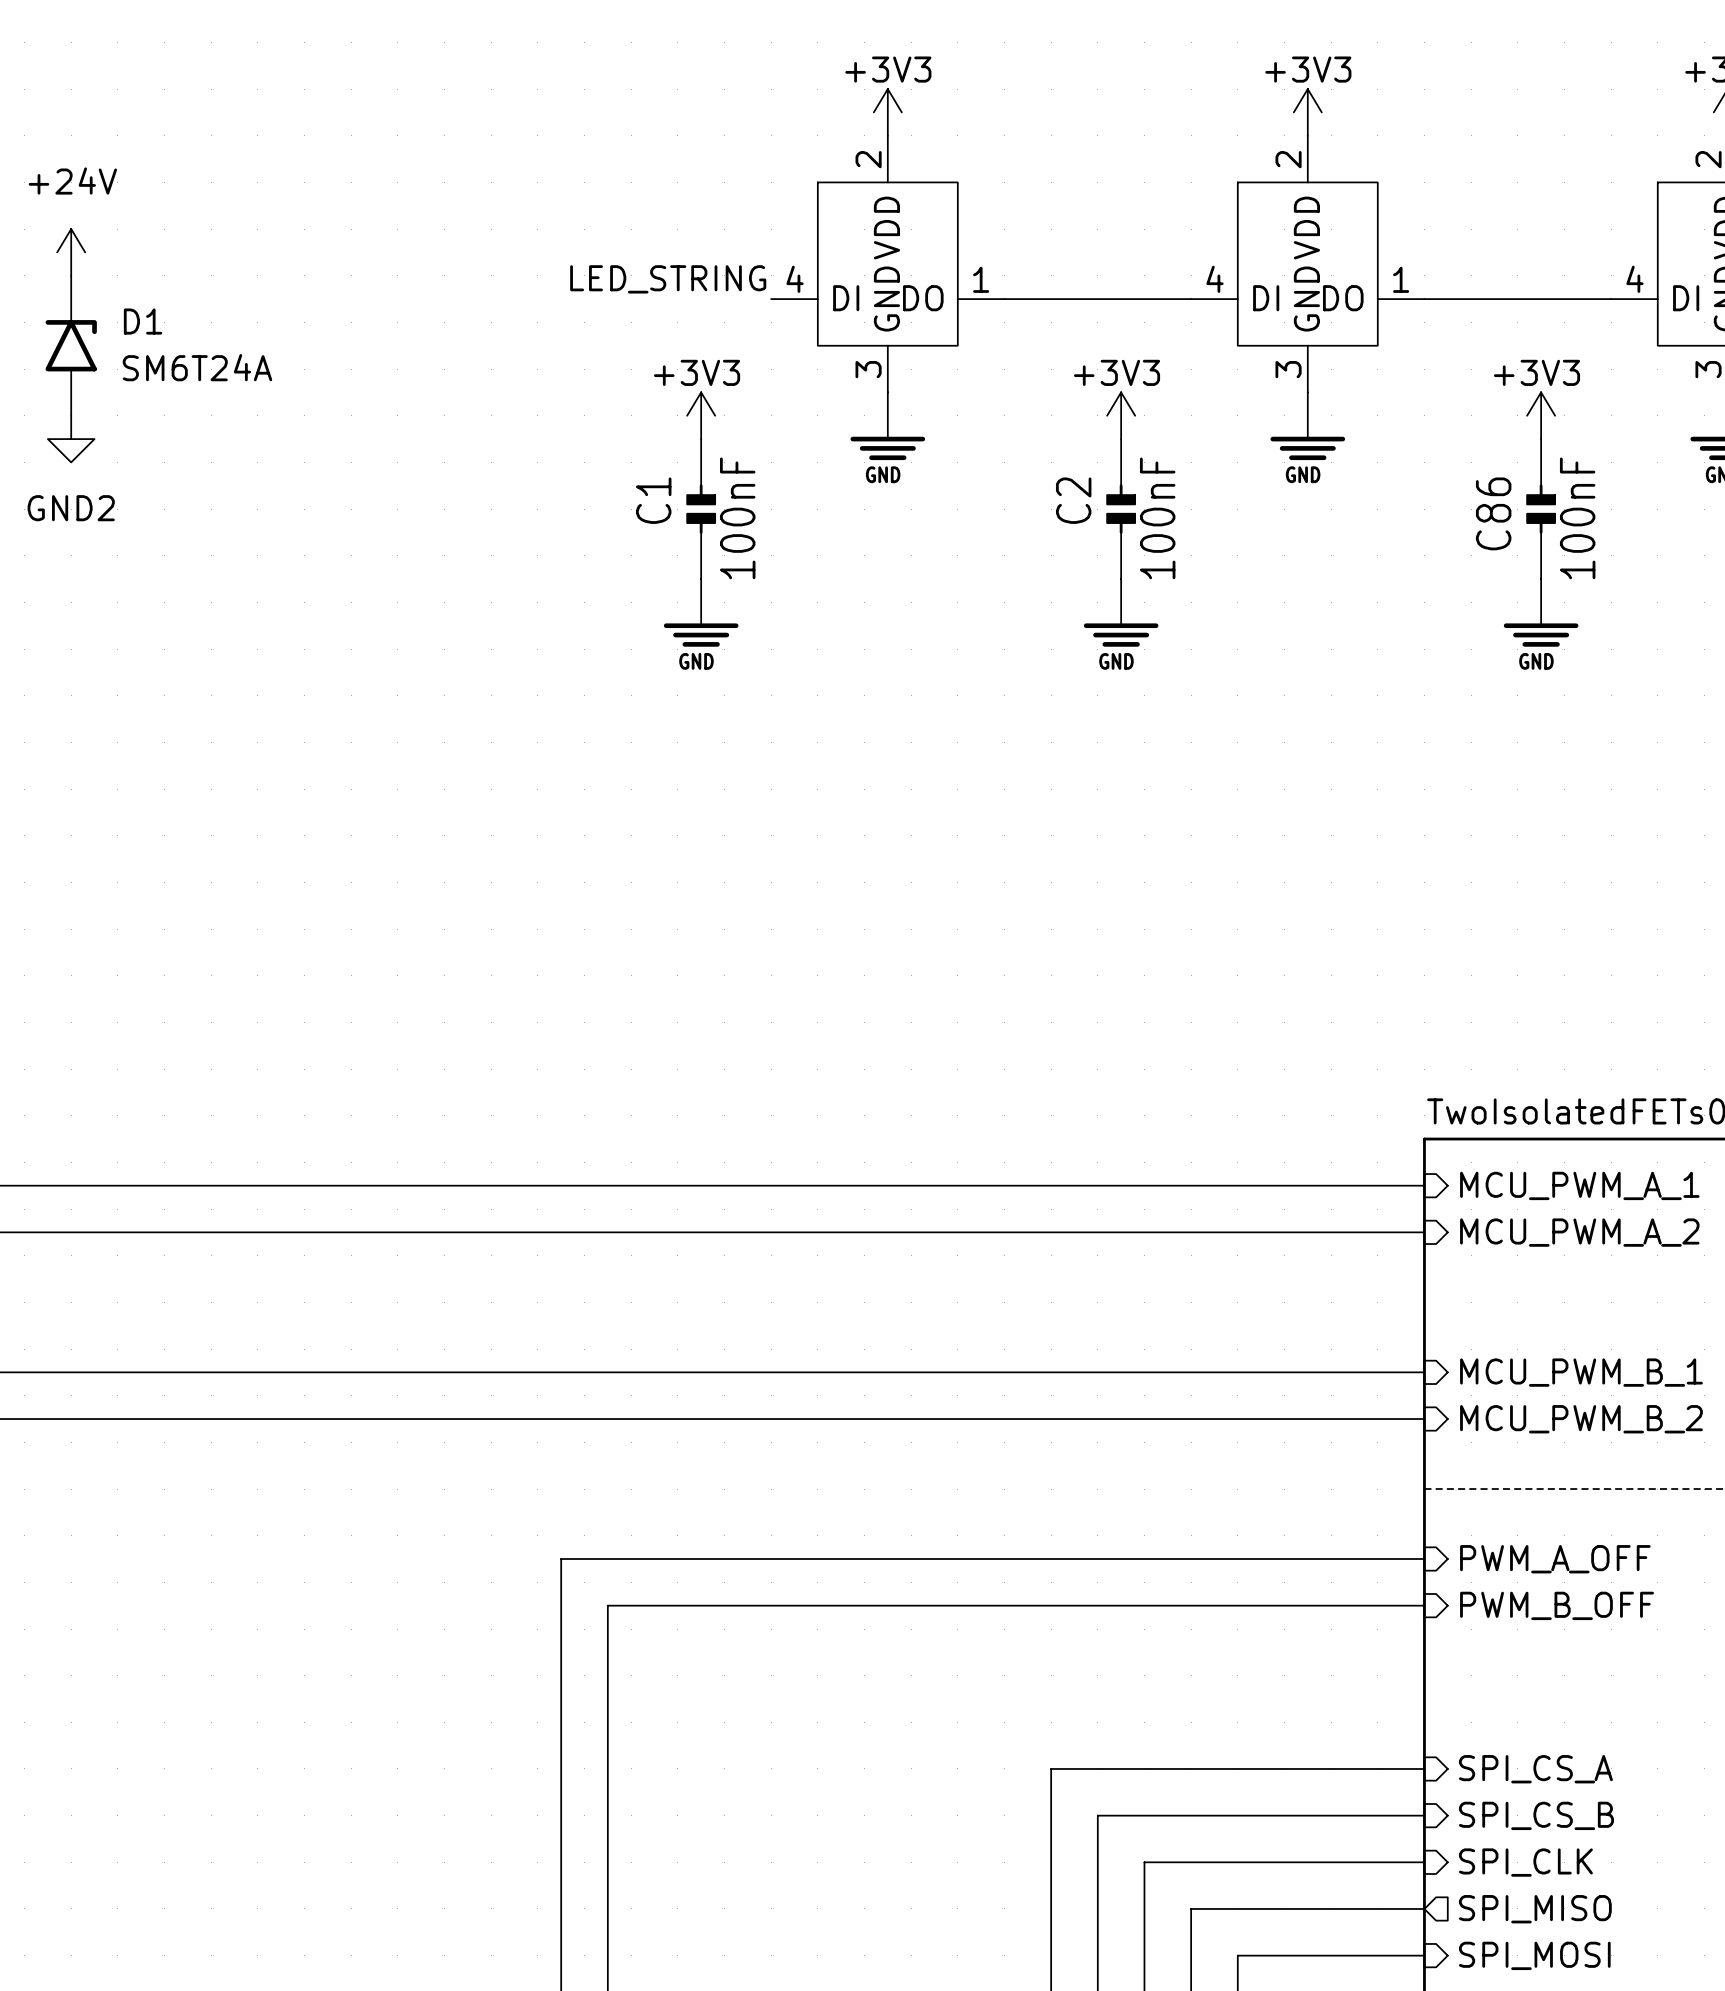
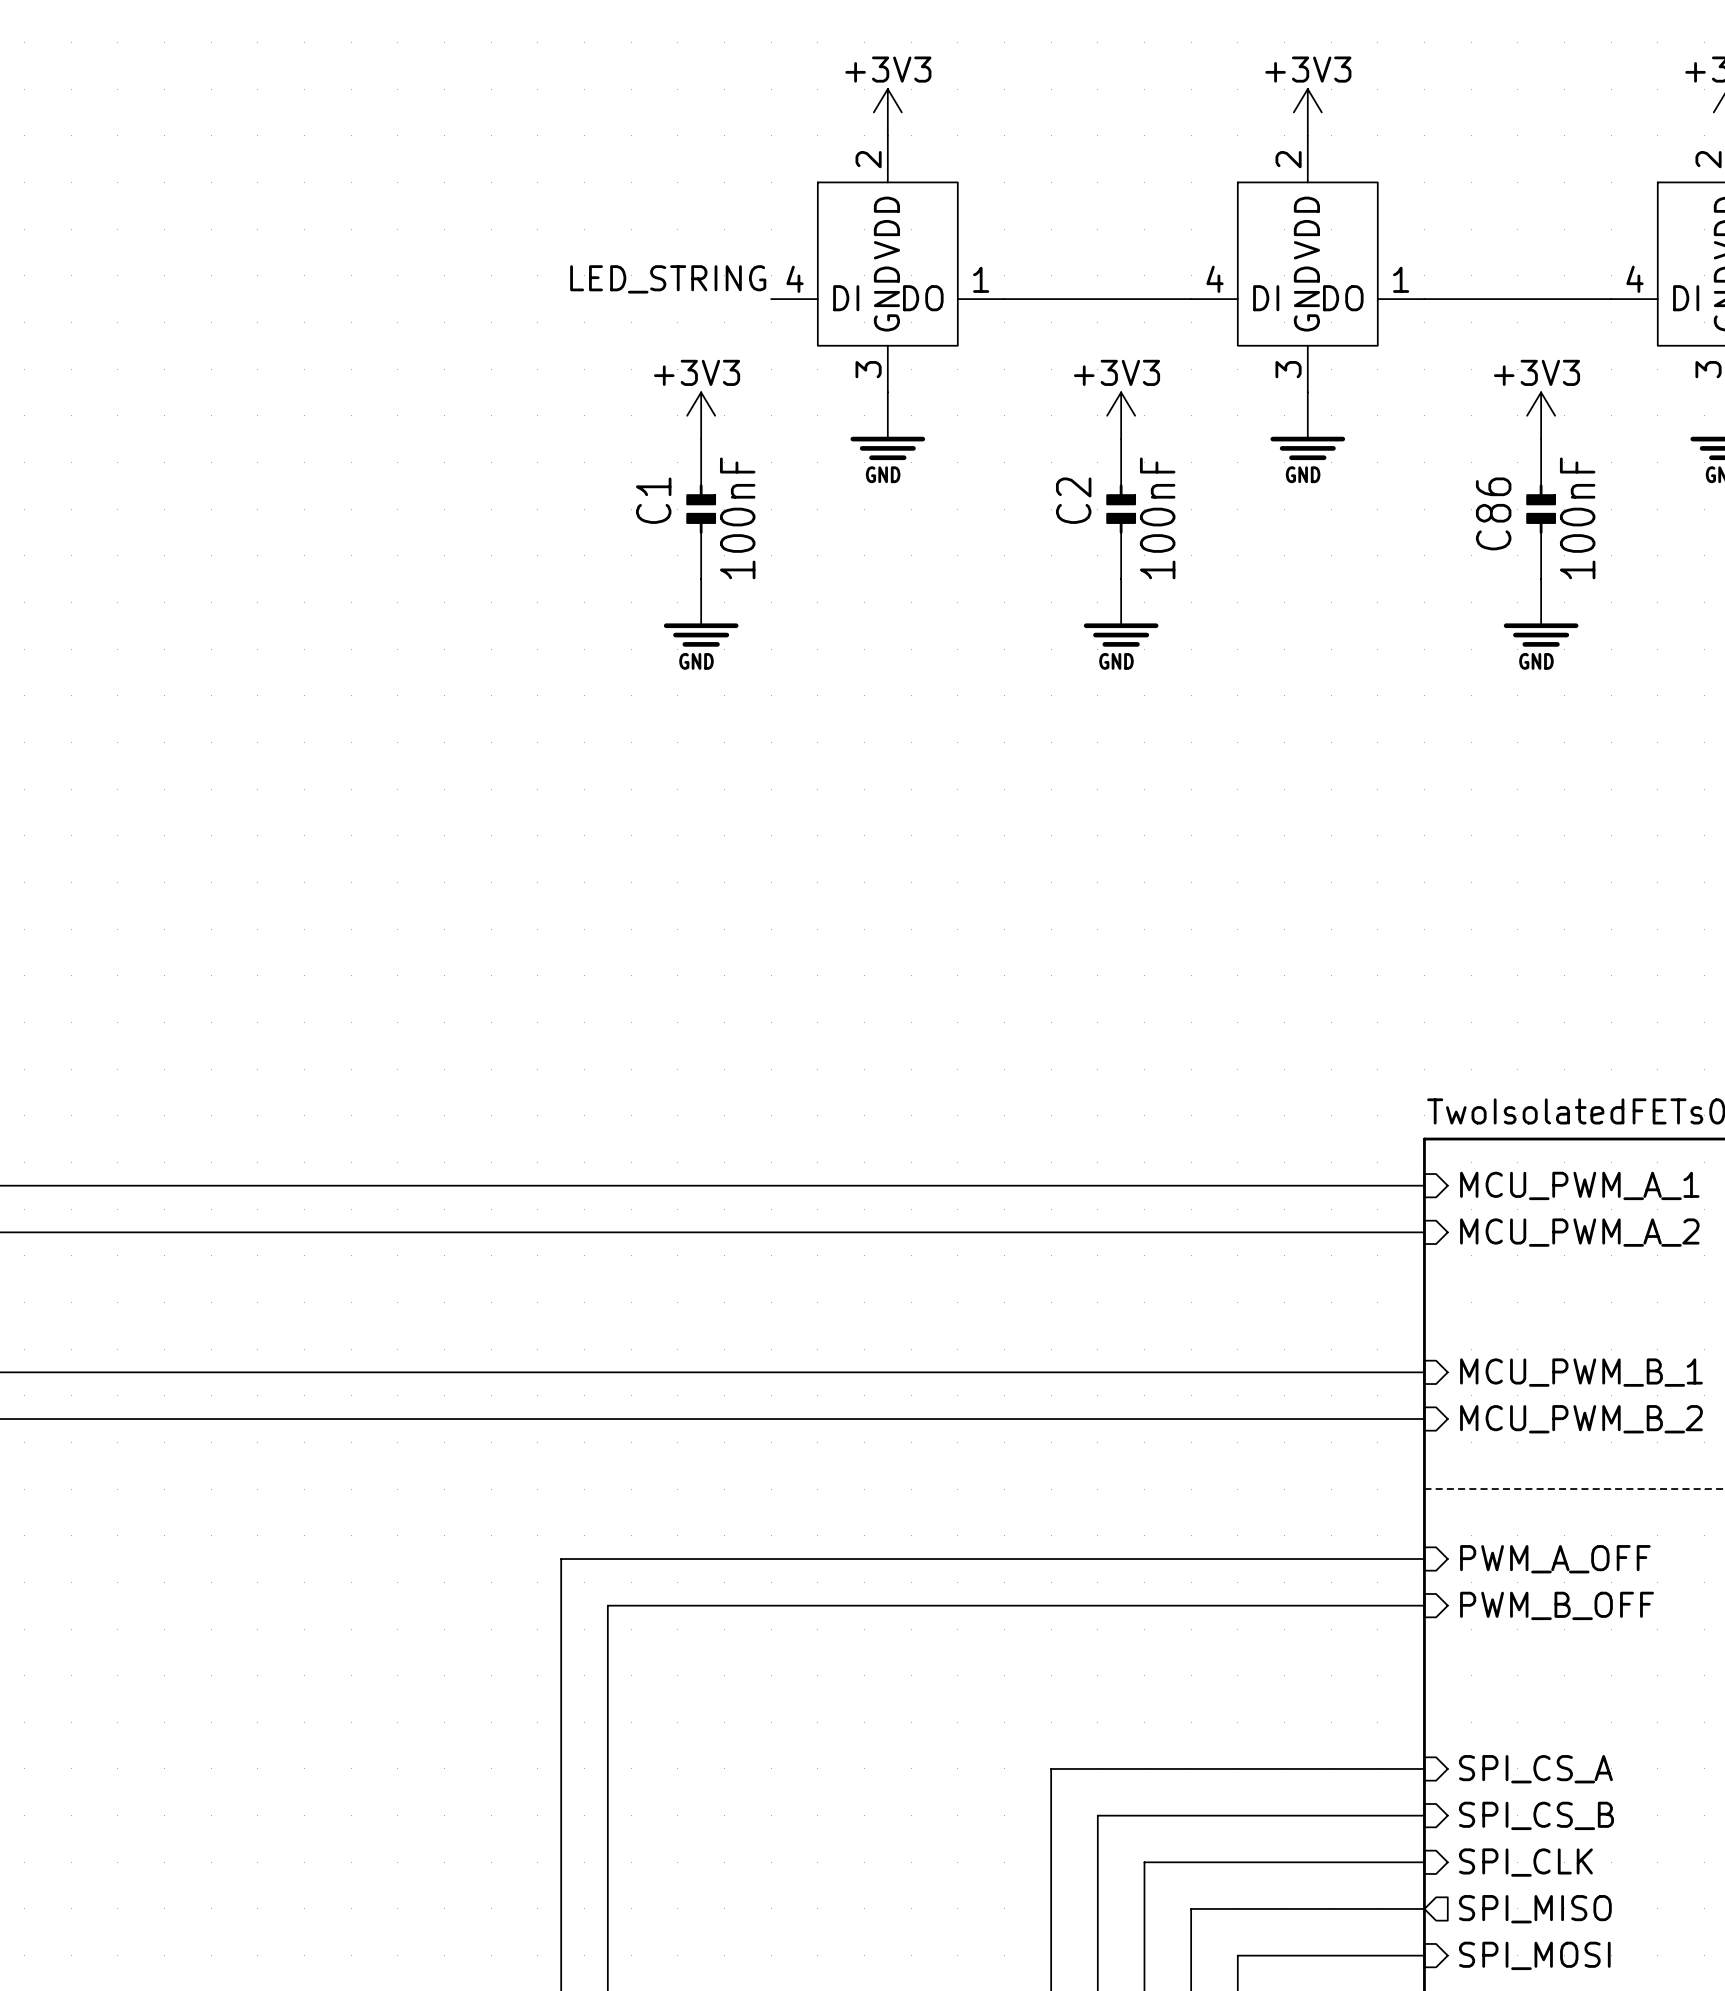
power symbol: +24V (71, 252) -> none
D1: SM6T24A (71, 345) -> none
power symbol: GND2 (71, 439) -> none

